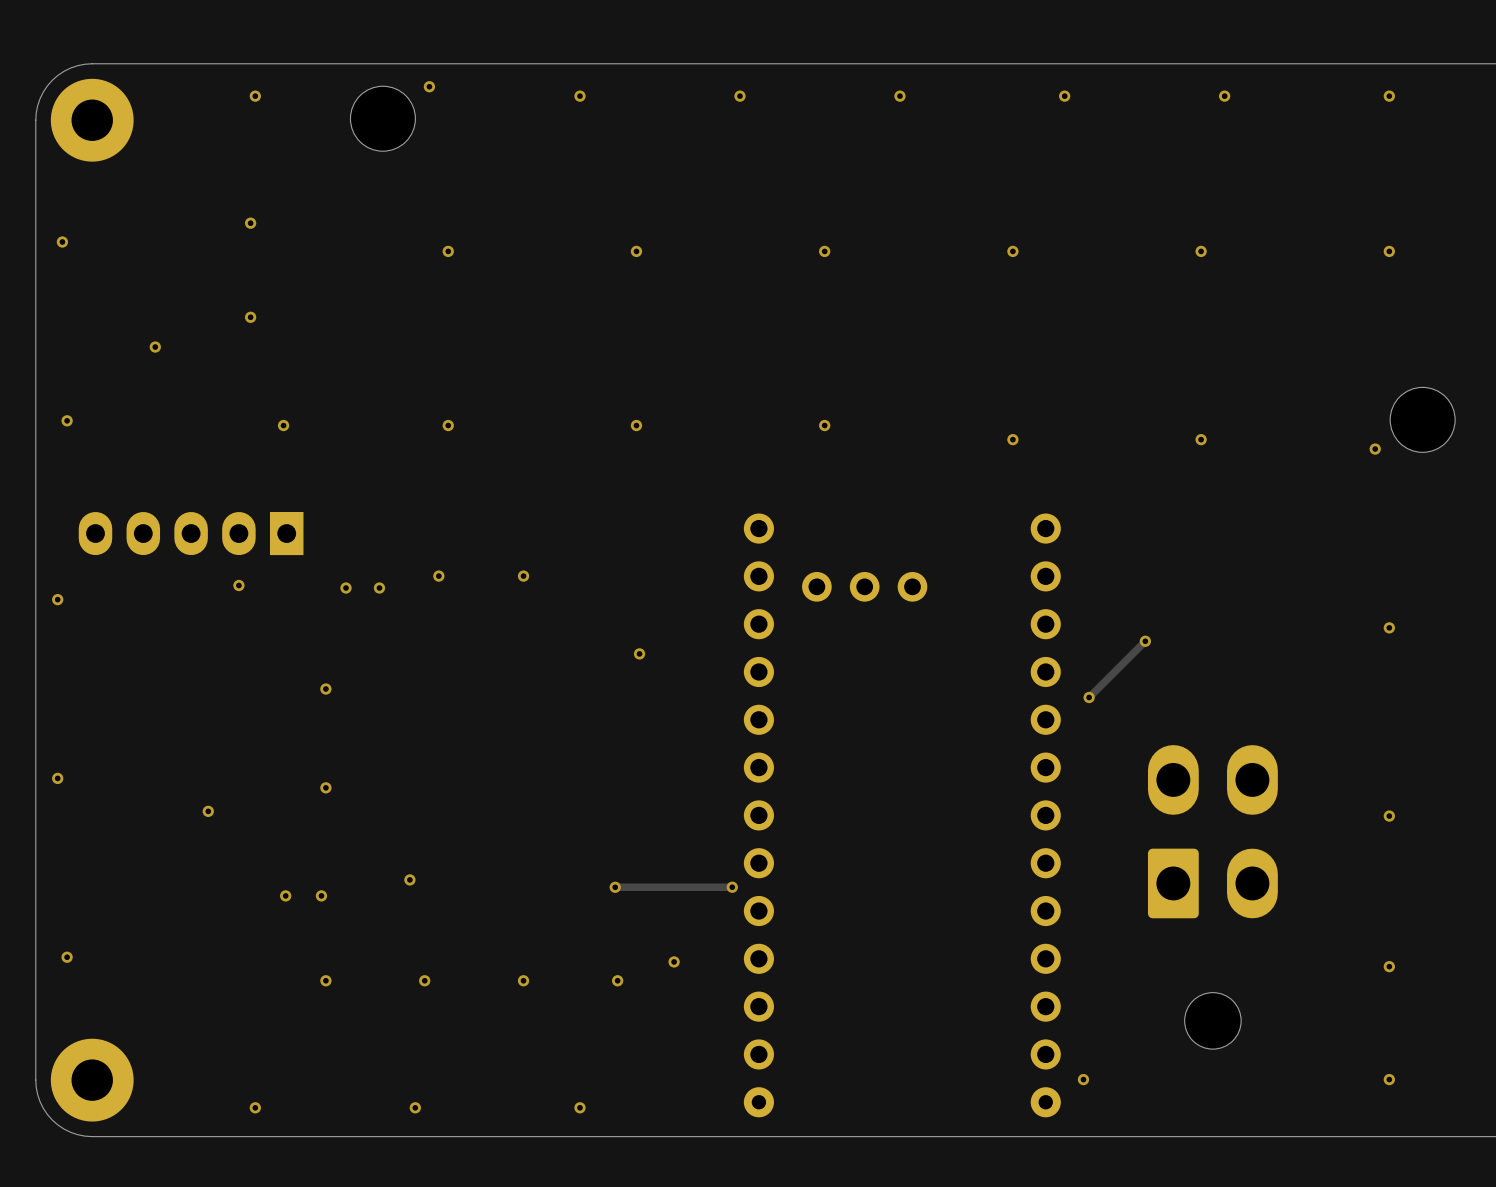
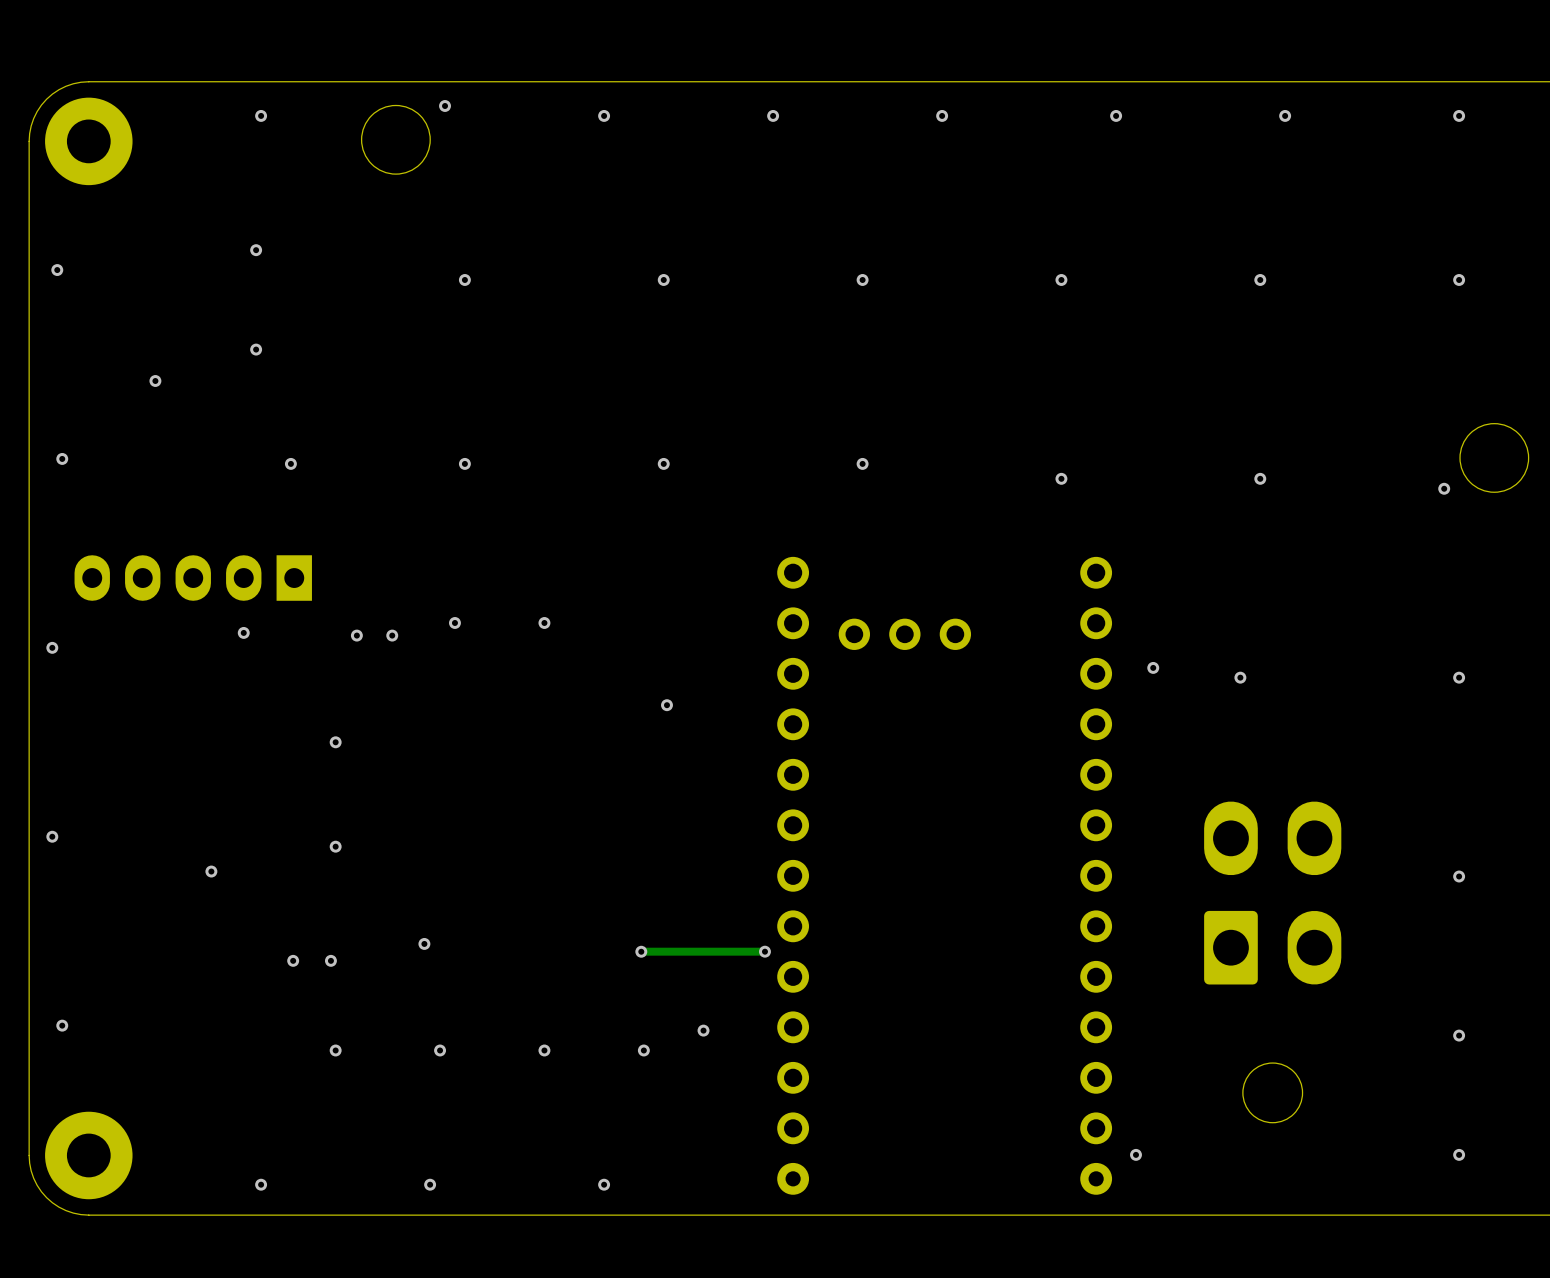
via: none -> (1153, 667)
via: none -> (1240, 677)
track: (1145, 641) (1089, 697) -> none
via: (1145, 641) -> none
via: (1089, 697) -> none

